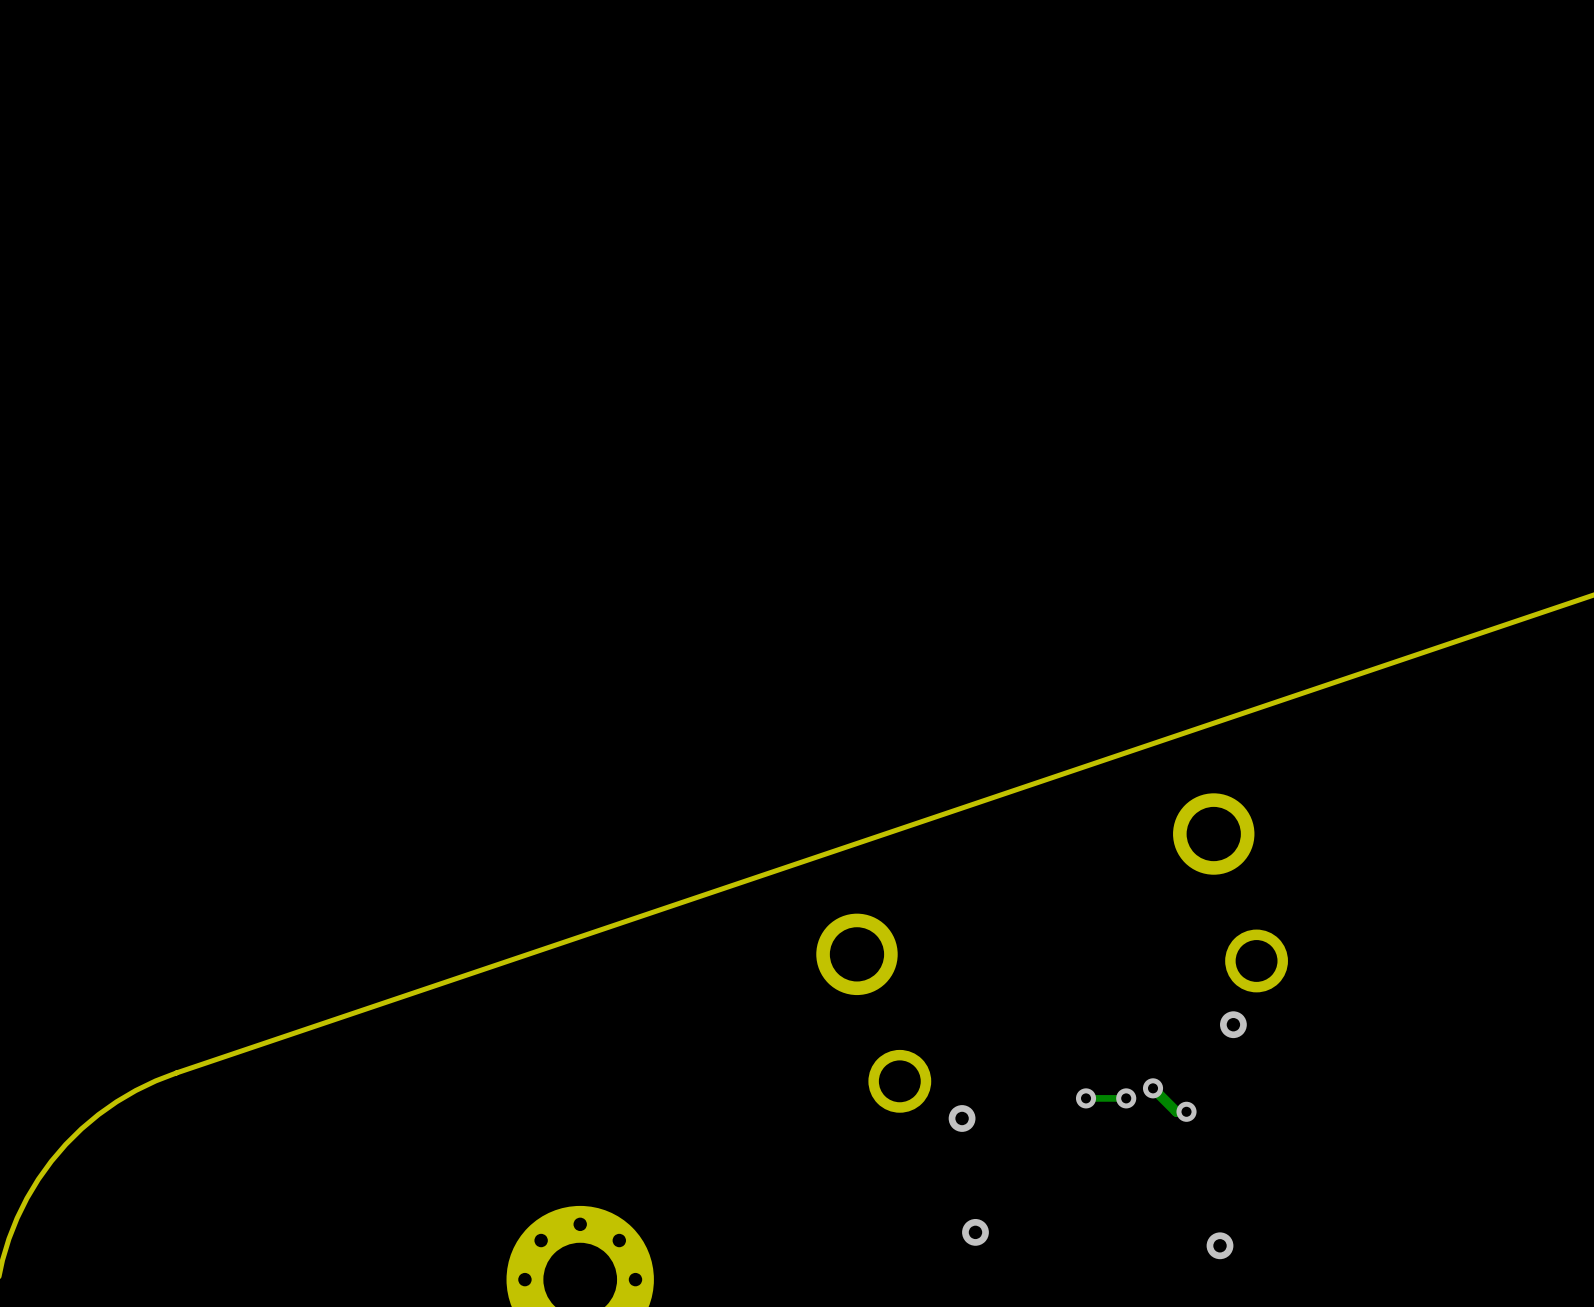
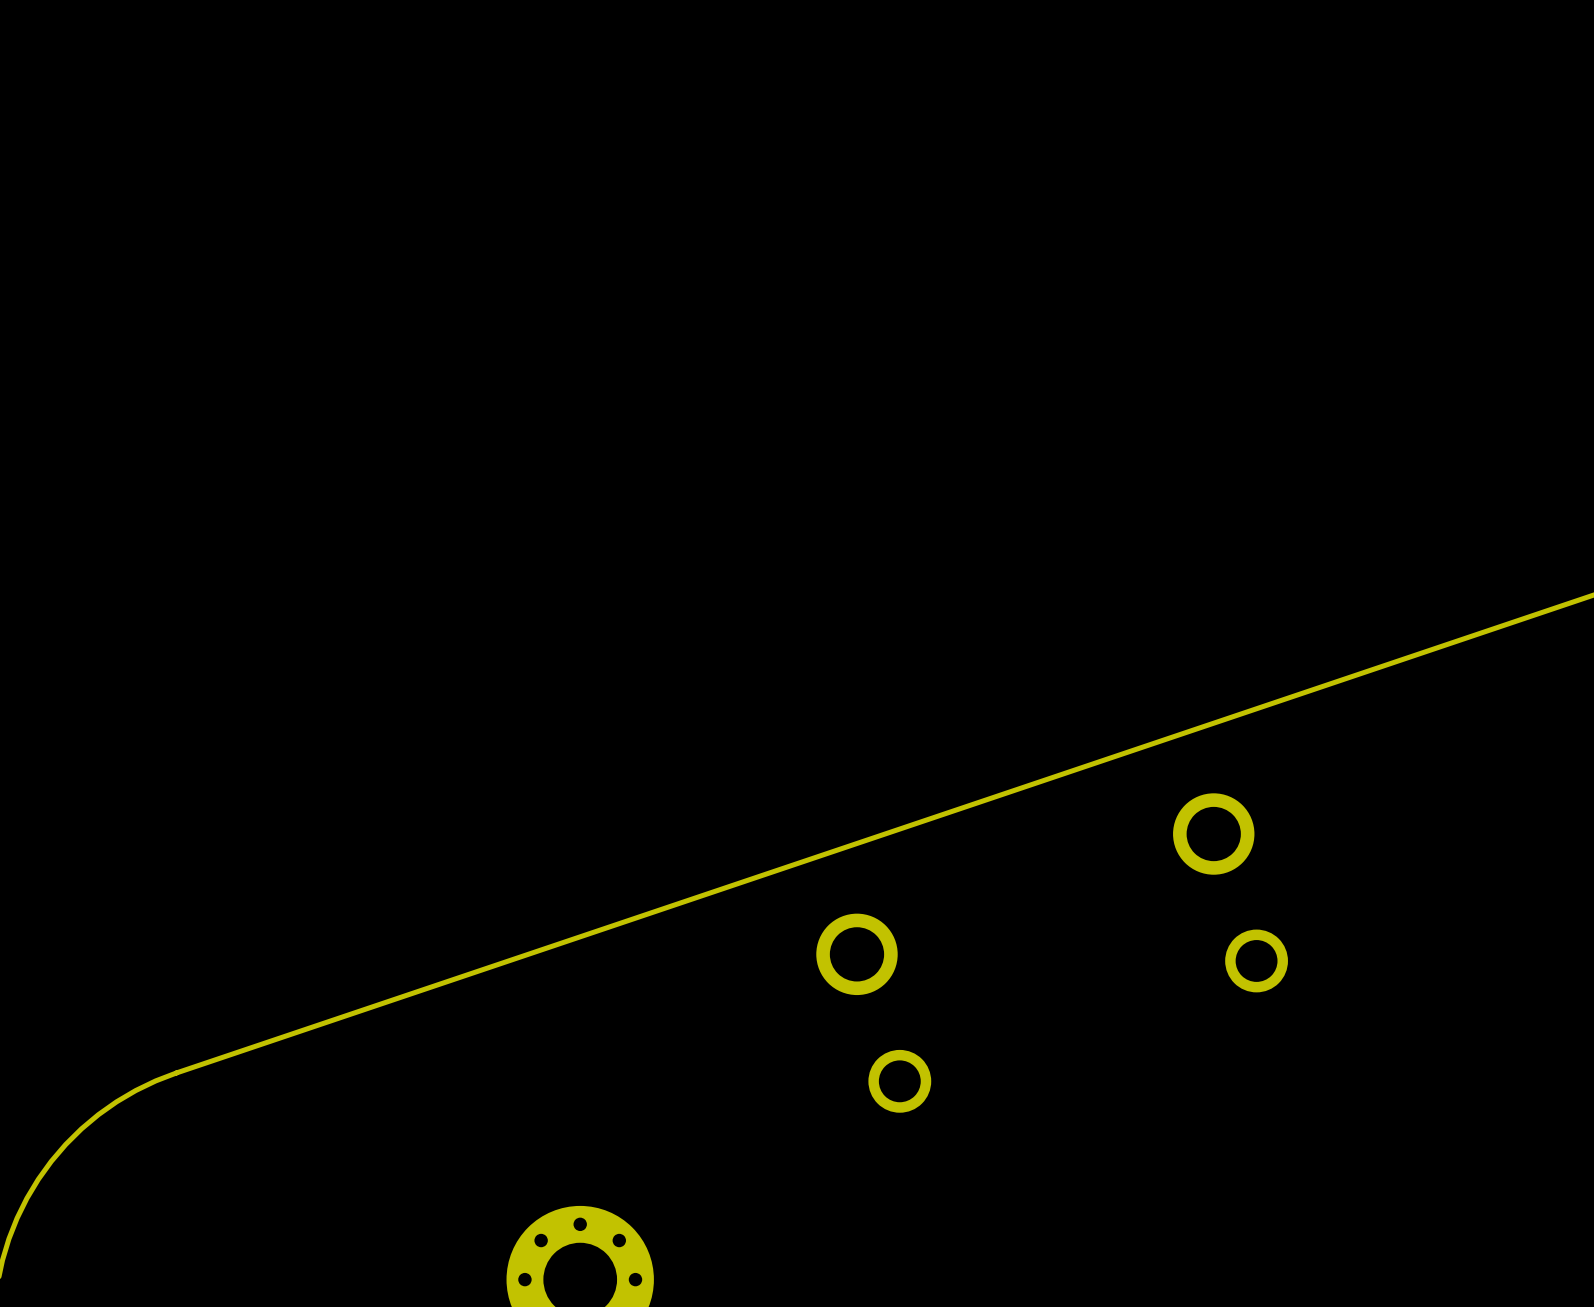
via: (1233, 1024) -> none
track: (1153, 1088) (1176, 1111) (1186, 1111) -> none
via: (1153, 1088) -> none
via: (1086, 1098) -> none
track: (1126, 1098) (1086, 1098) -> none
via: (1126, 1098) -> none
via: (1186, 1111) -> none
via: (962, 1118) -> none
via: (975, 1232) -> none
via: (1220, 1245) -> none

